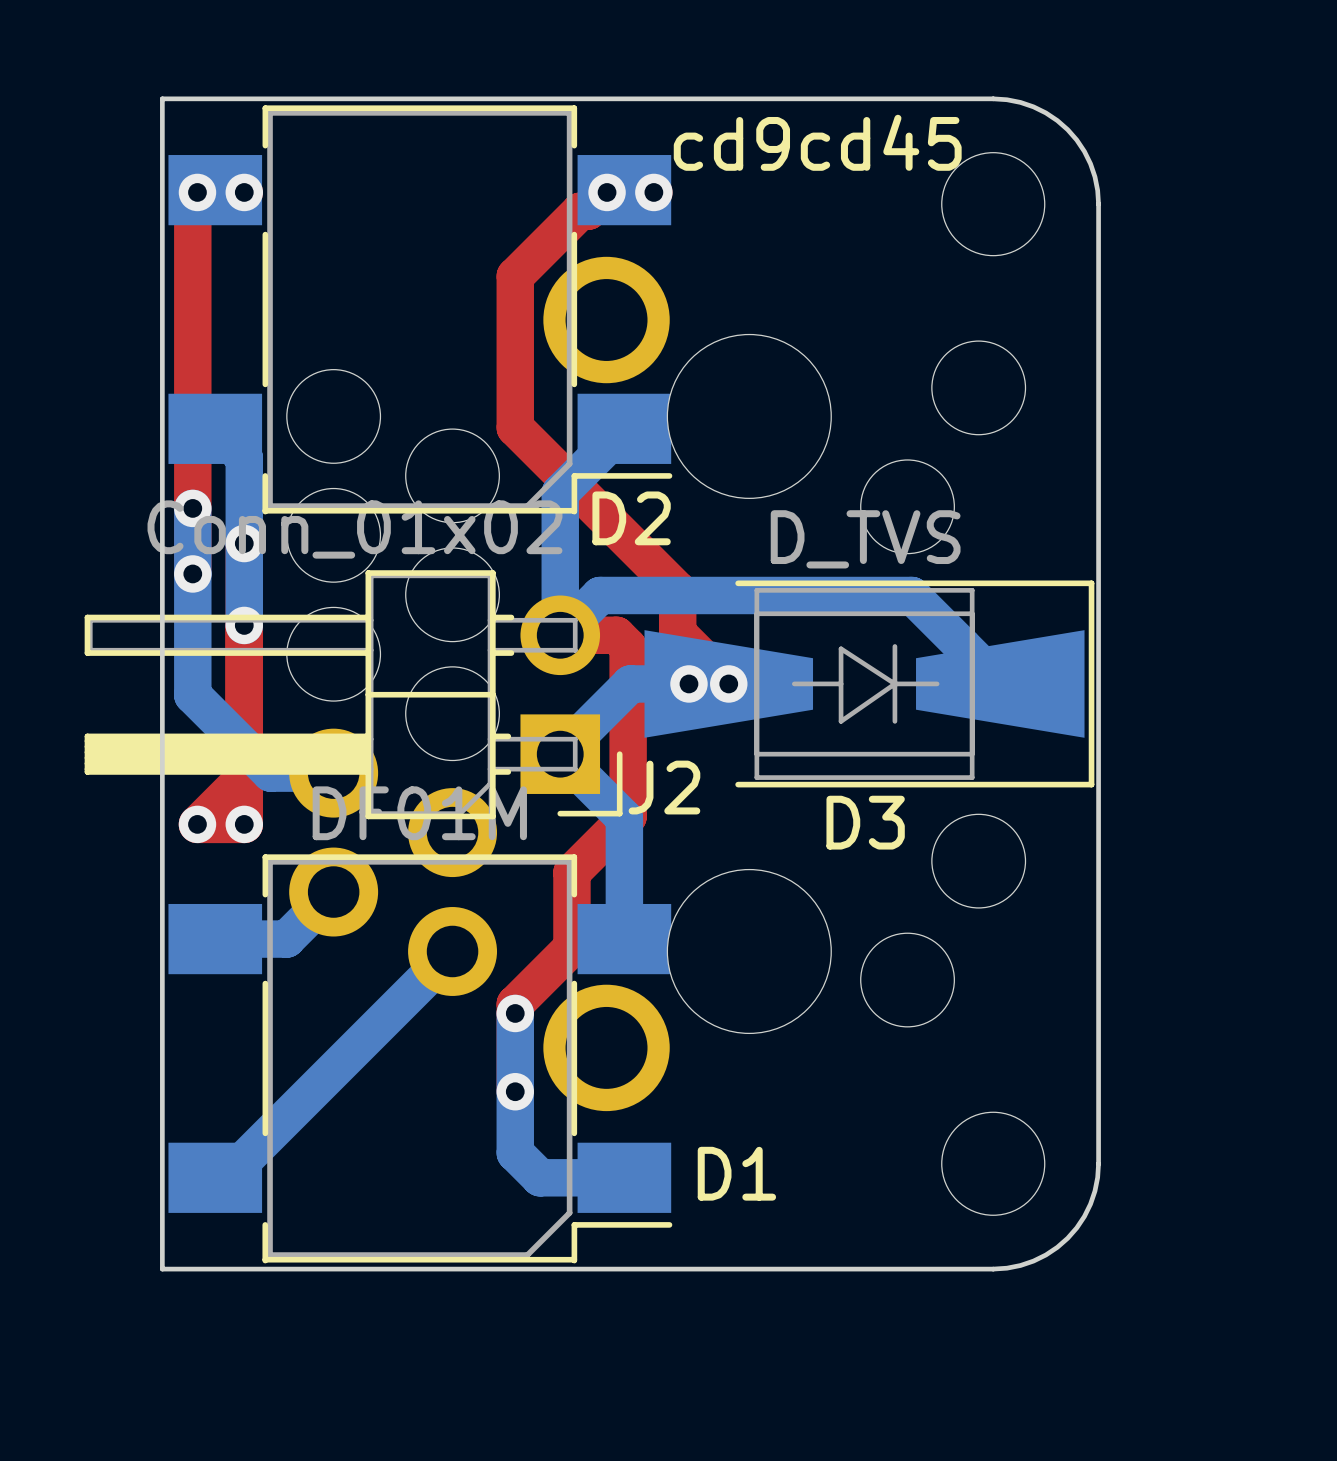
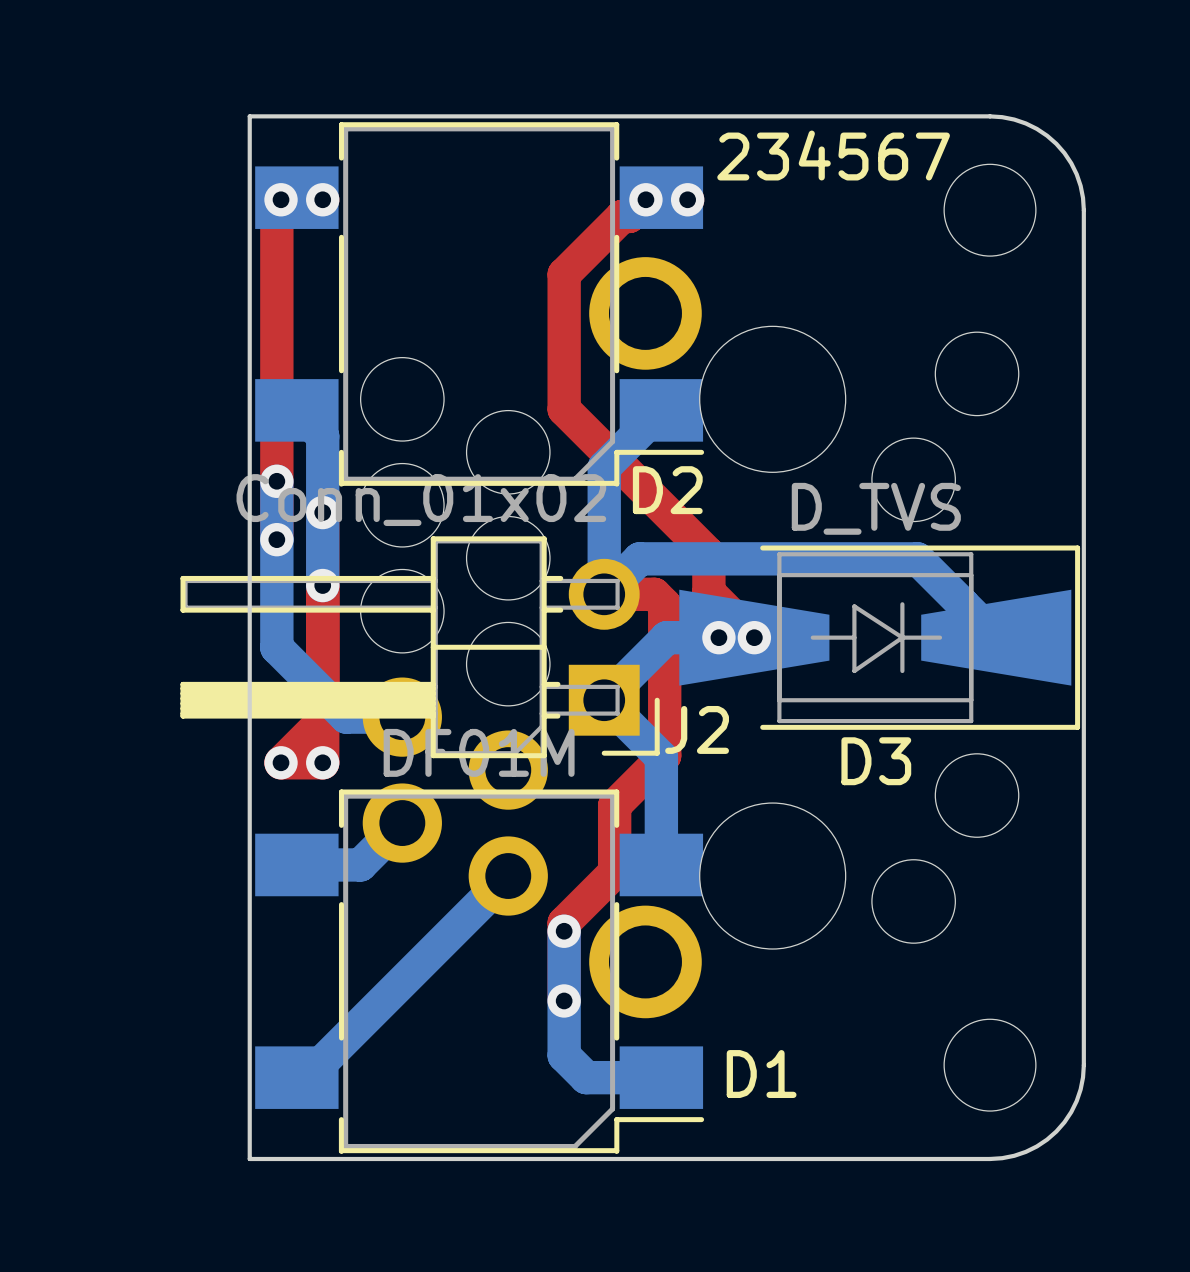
text: cd9cd45 (817, 142) -> 234567 (833, 155)

